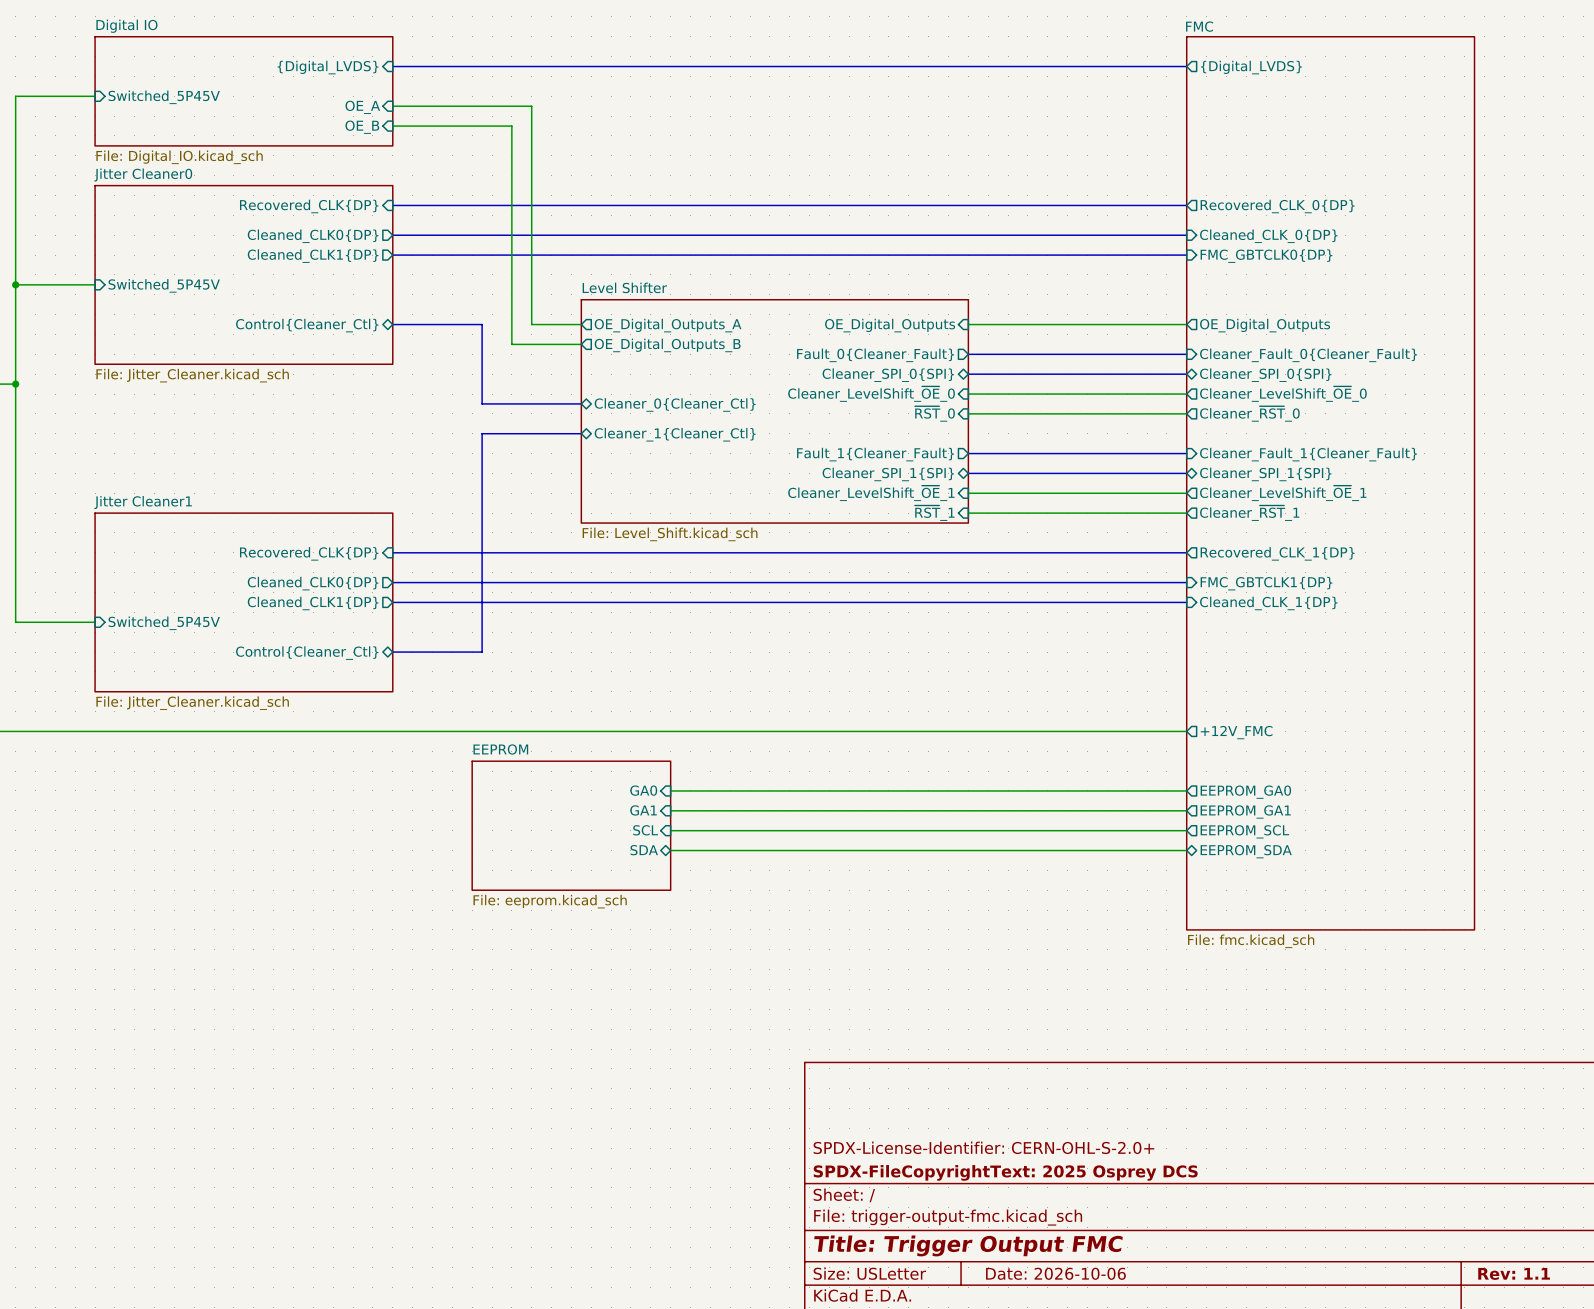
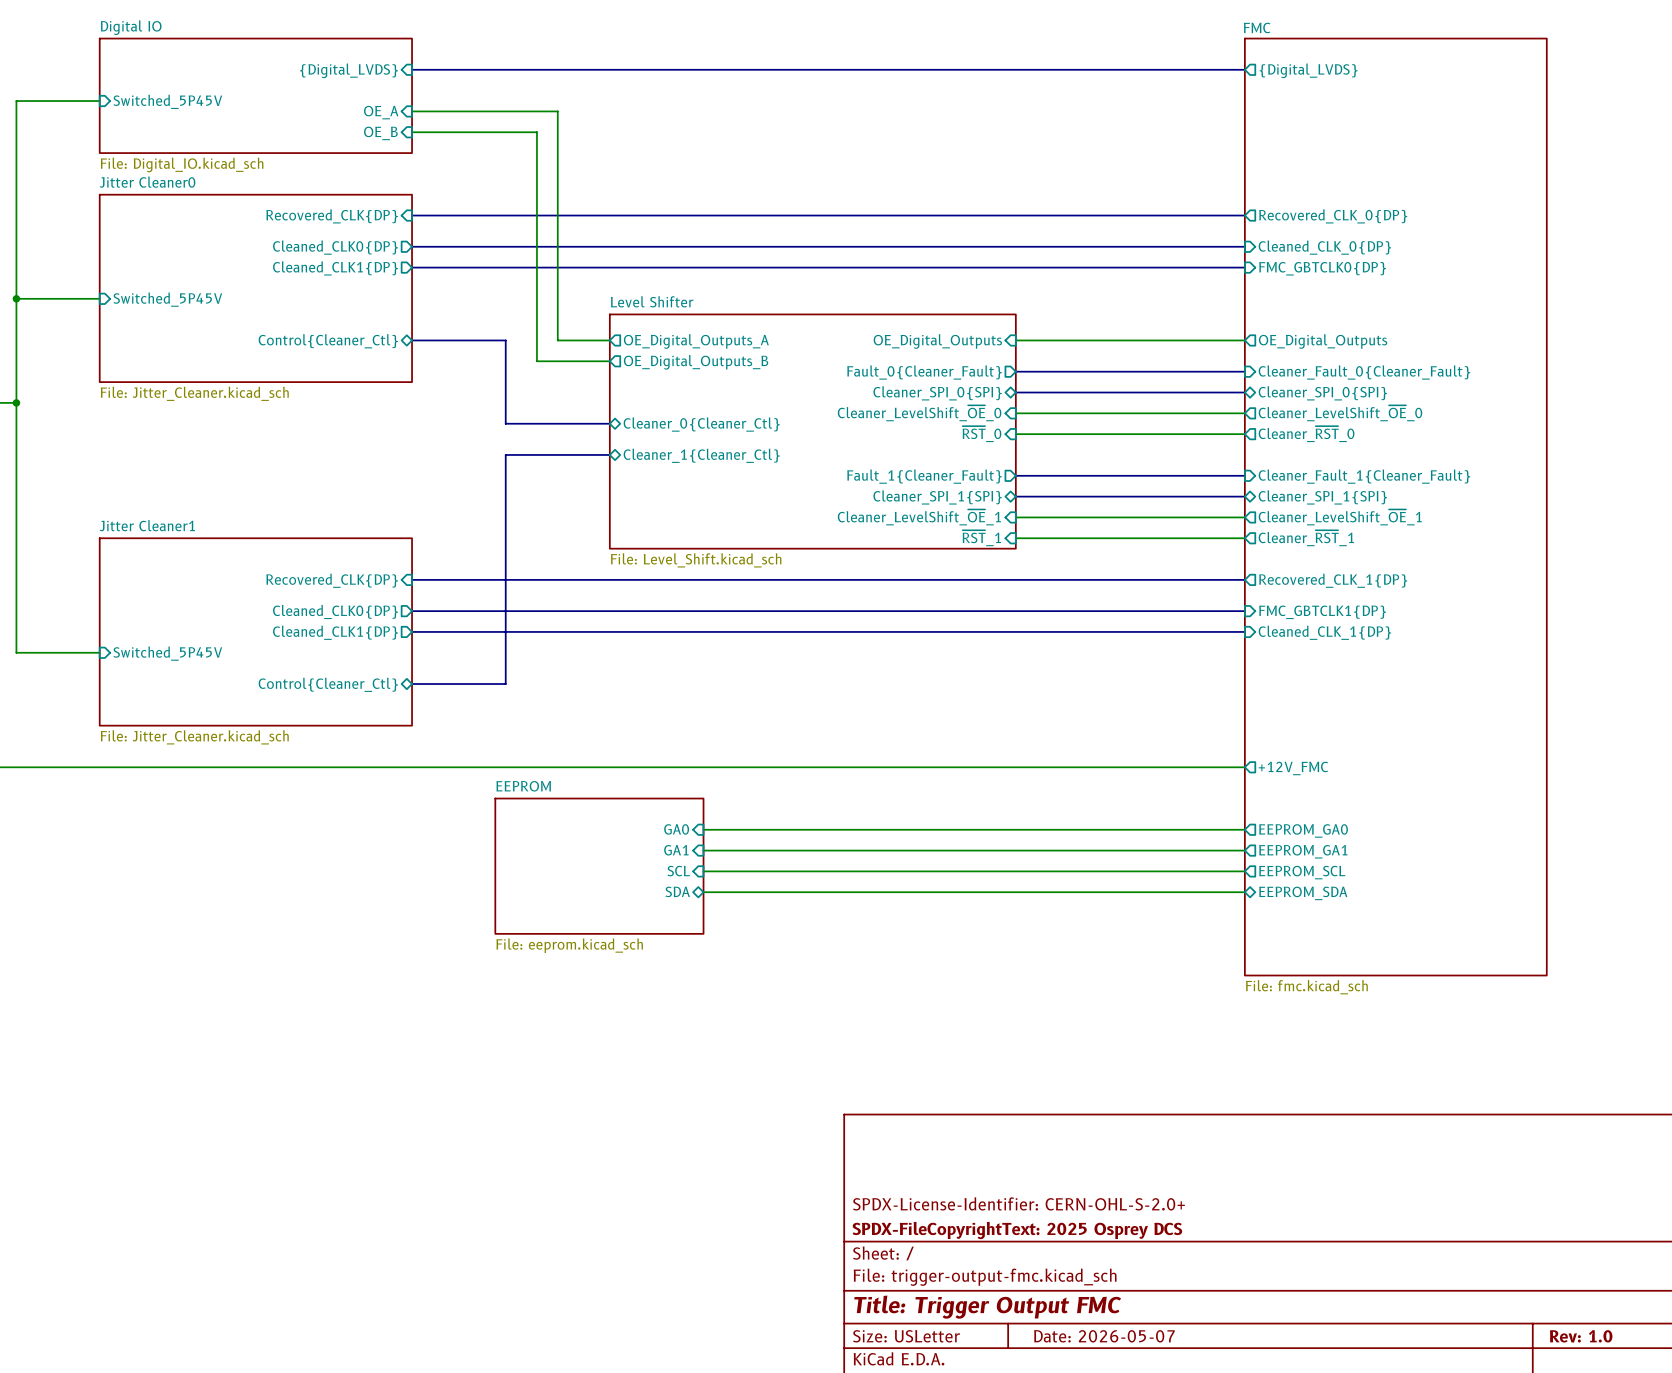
title block: Date: 2026-10-06 (1055, 1273) -> Date: 2026-05-07 (1104, 1336)
title block: Rev: 1.1 (1514, 1273) -> Rev: 1.0 (1581, 1336)

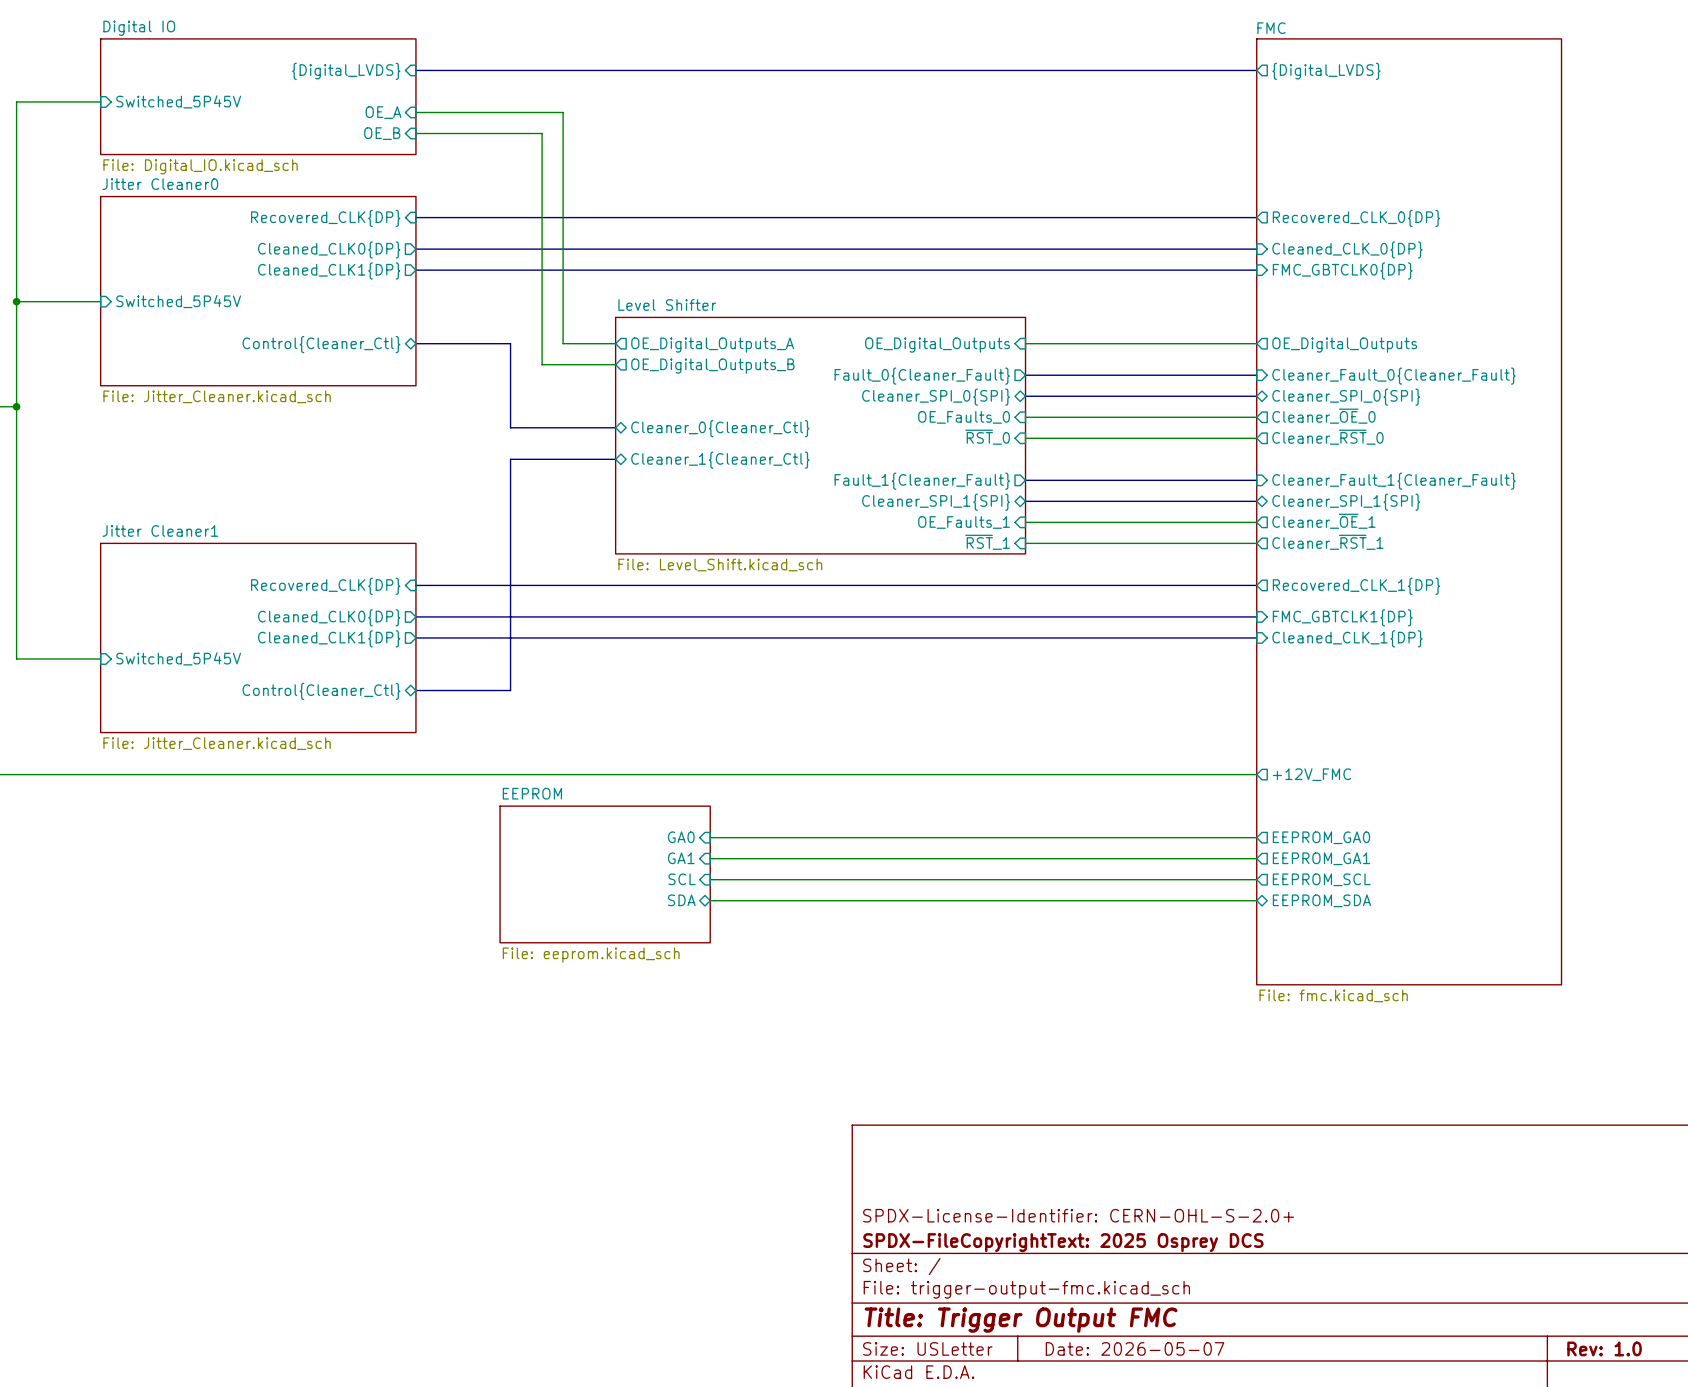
sheet pin: Cleaner_LevelShift_~{OE}_0 (919, 413) -> OE_Faults_0 (964, 417)
sheet pin: Cleaner_LevelShift_~{OE}_0 (1340, 413) -> Cleaner_~{OE}_0 (1323, 416)
sheet pin: Cleaner_LevelShift_~{OE}_1 (919, 517) -> OE_Faults_1 (964, 522)
sheet pin: Cleaner_LevelShift_~{OE}_1 (1340, 517) -> Cleaner_~{OE}_1 (1323, 521)

